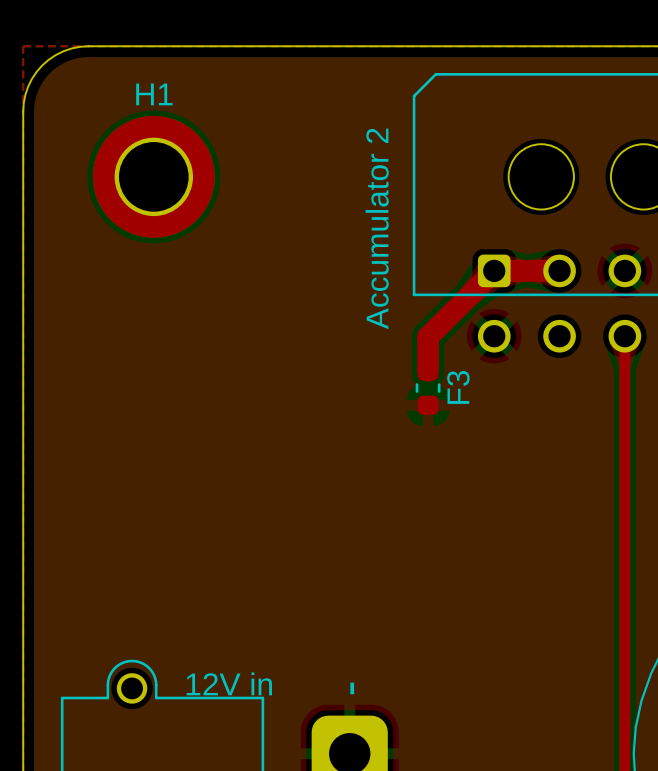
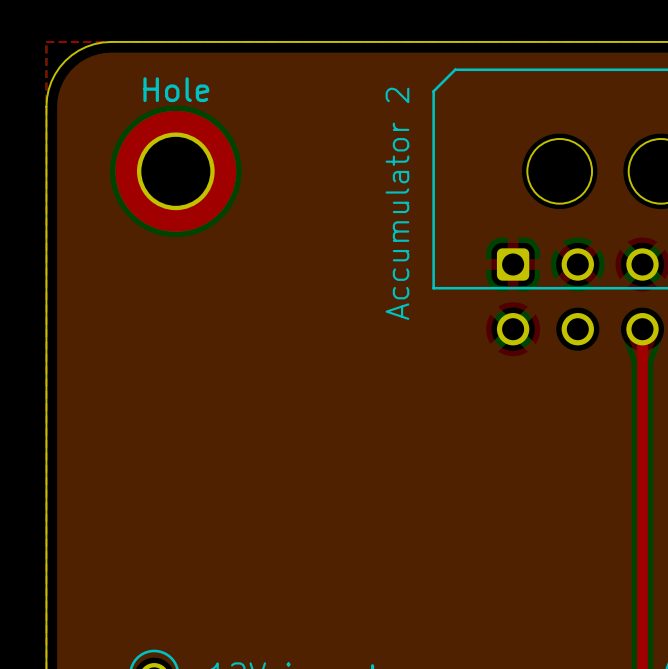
H1 name: H1 (154, 94) -> Hole (176, 89)
top track: (559, 270) (494, 270) (428, 337) (428, 370) -> none
F3: (428, 388) -> none

